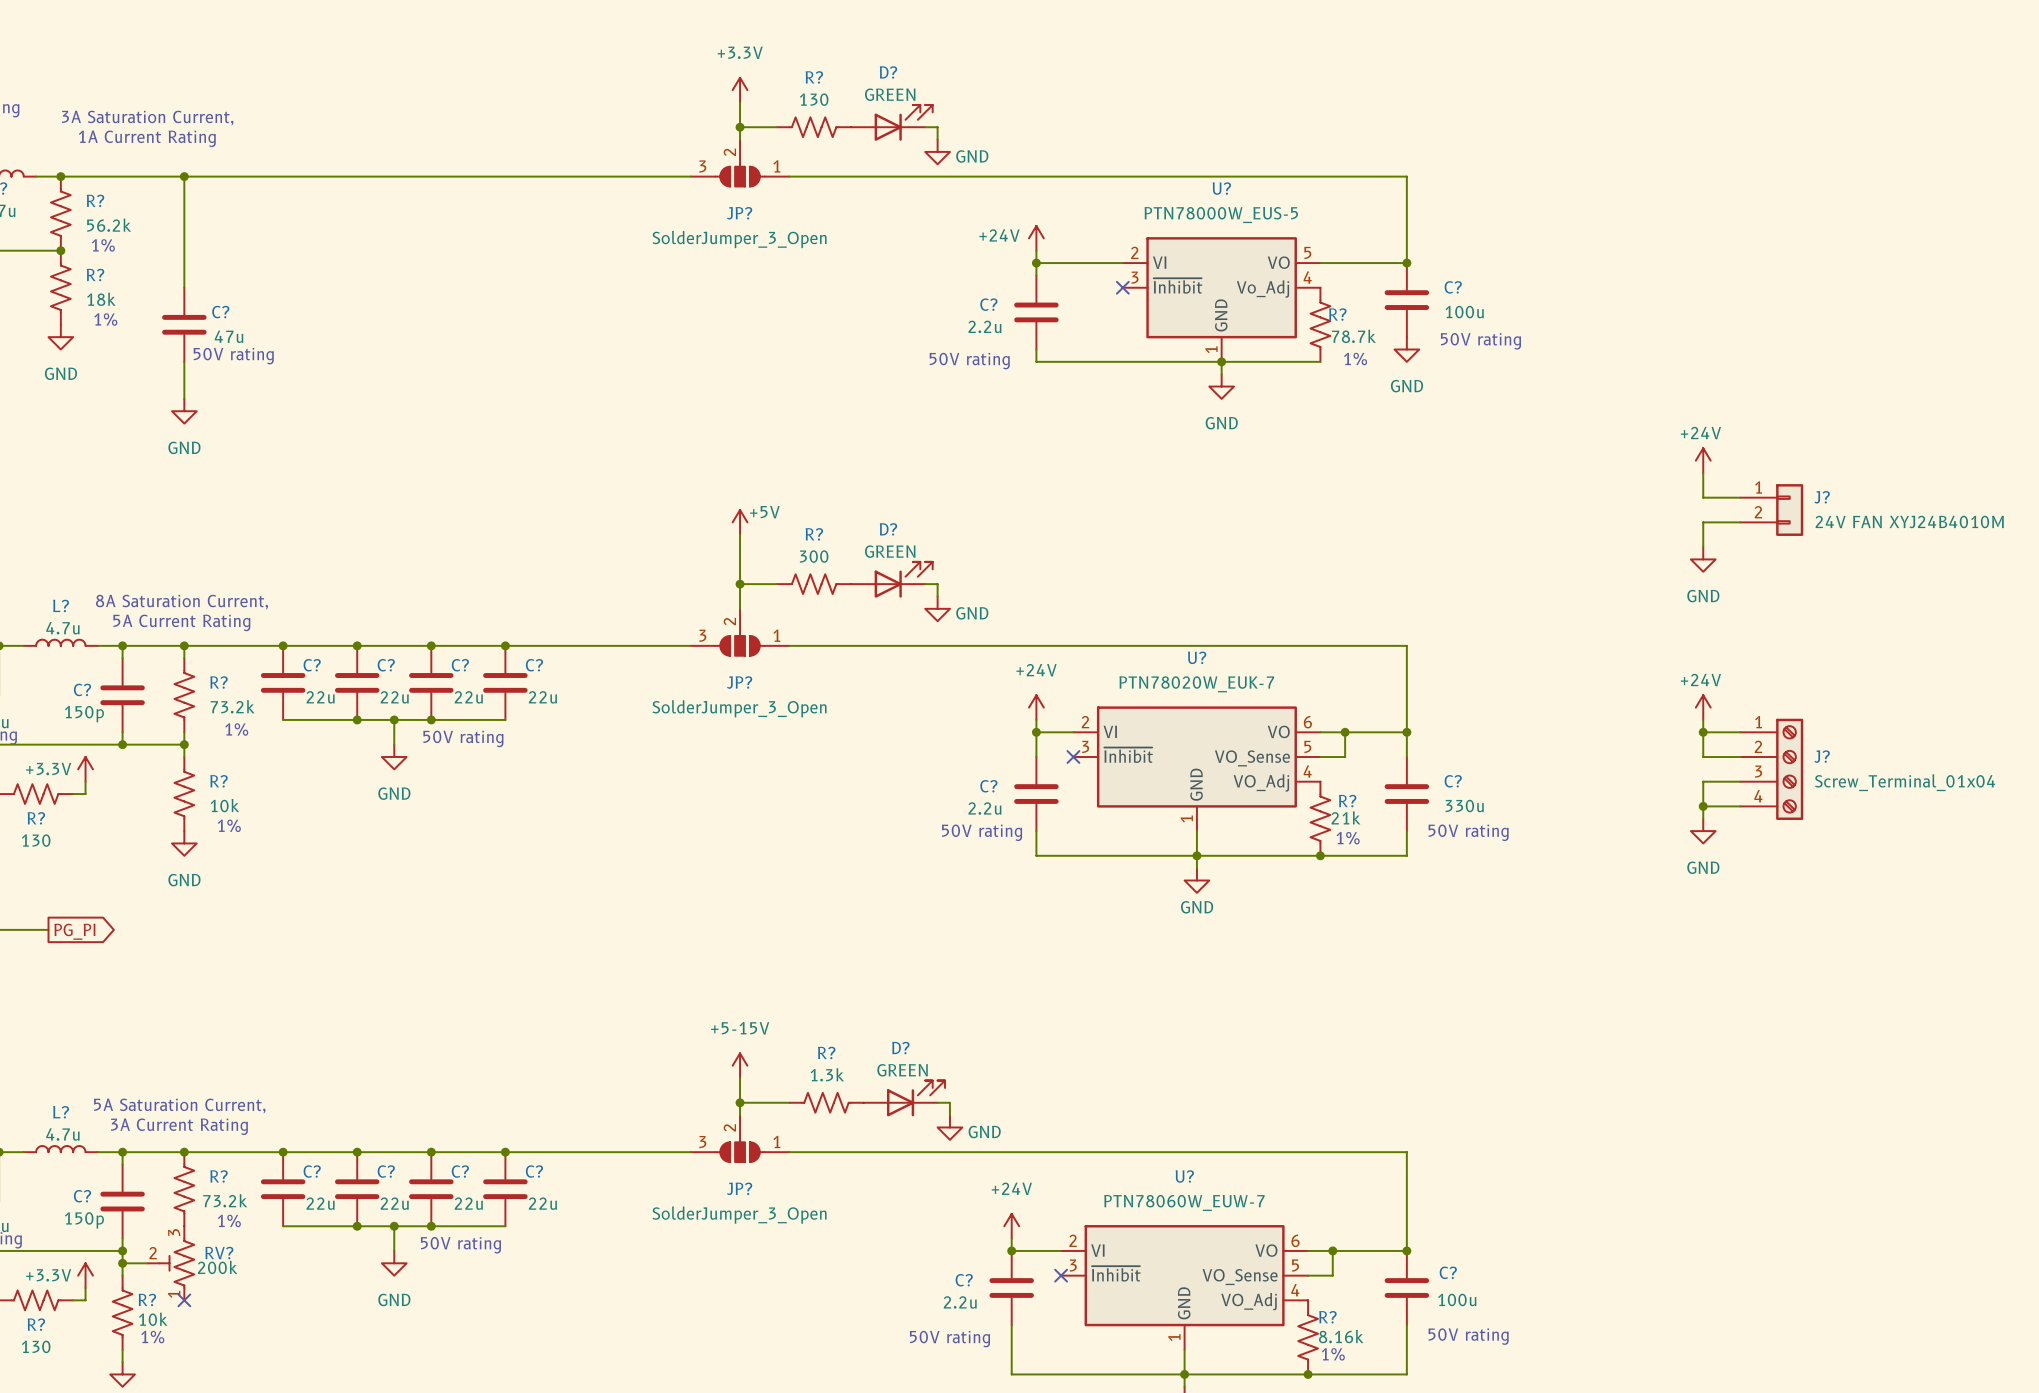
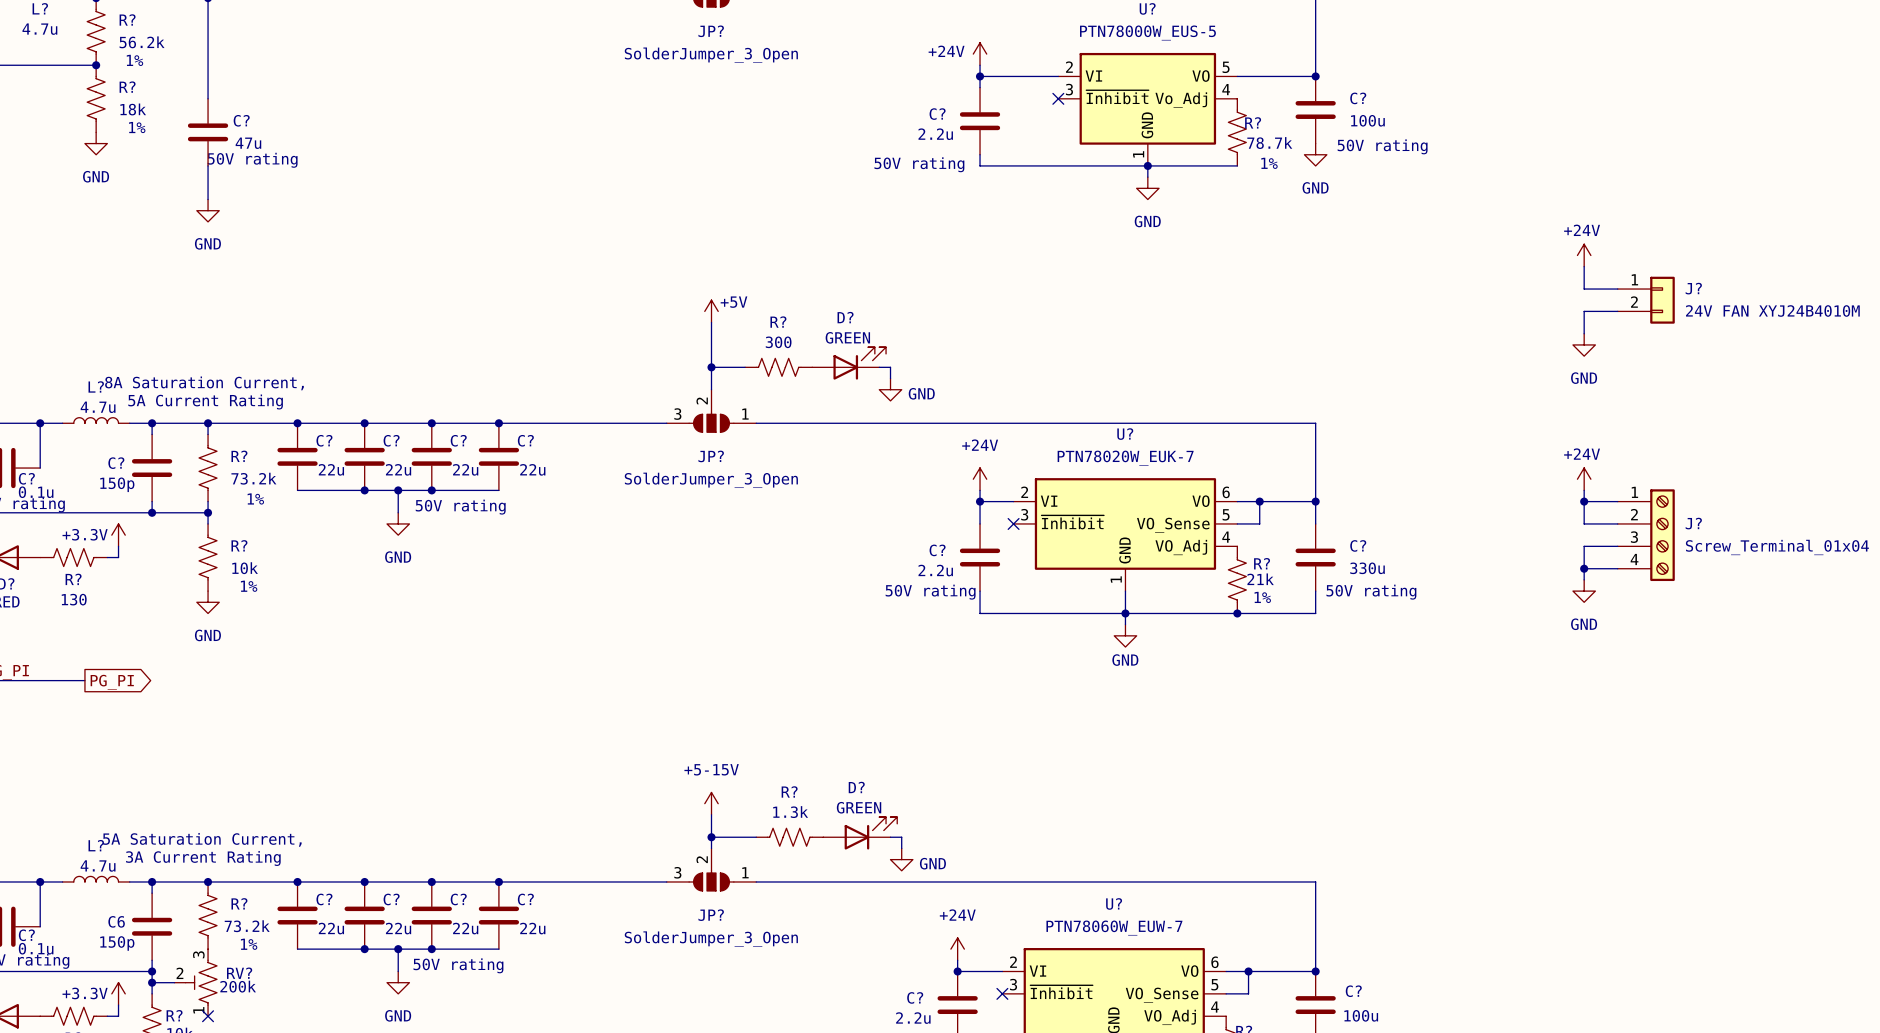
C? name: C? (82, 1196) -> C6 (116, 921)

